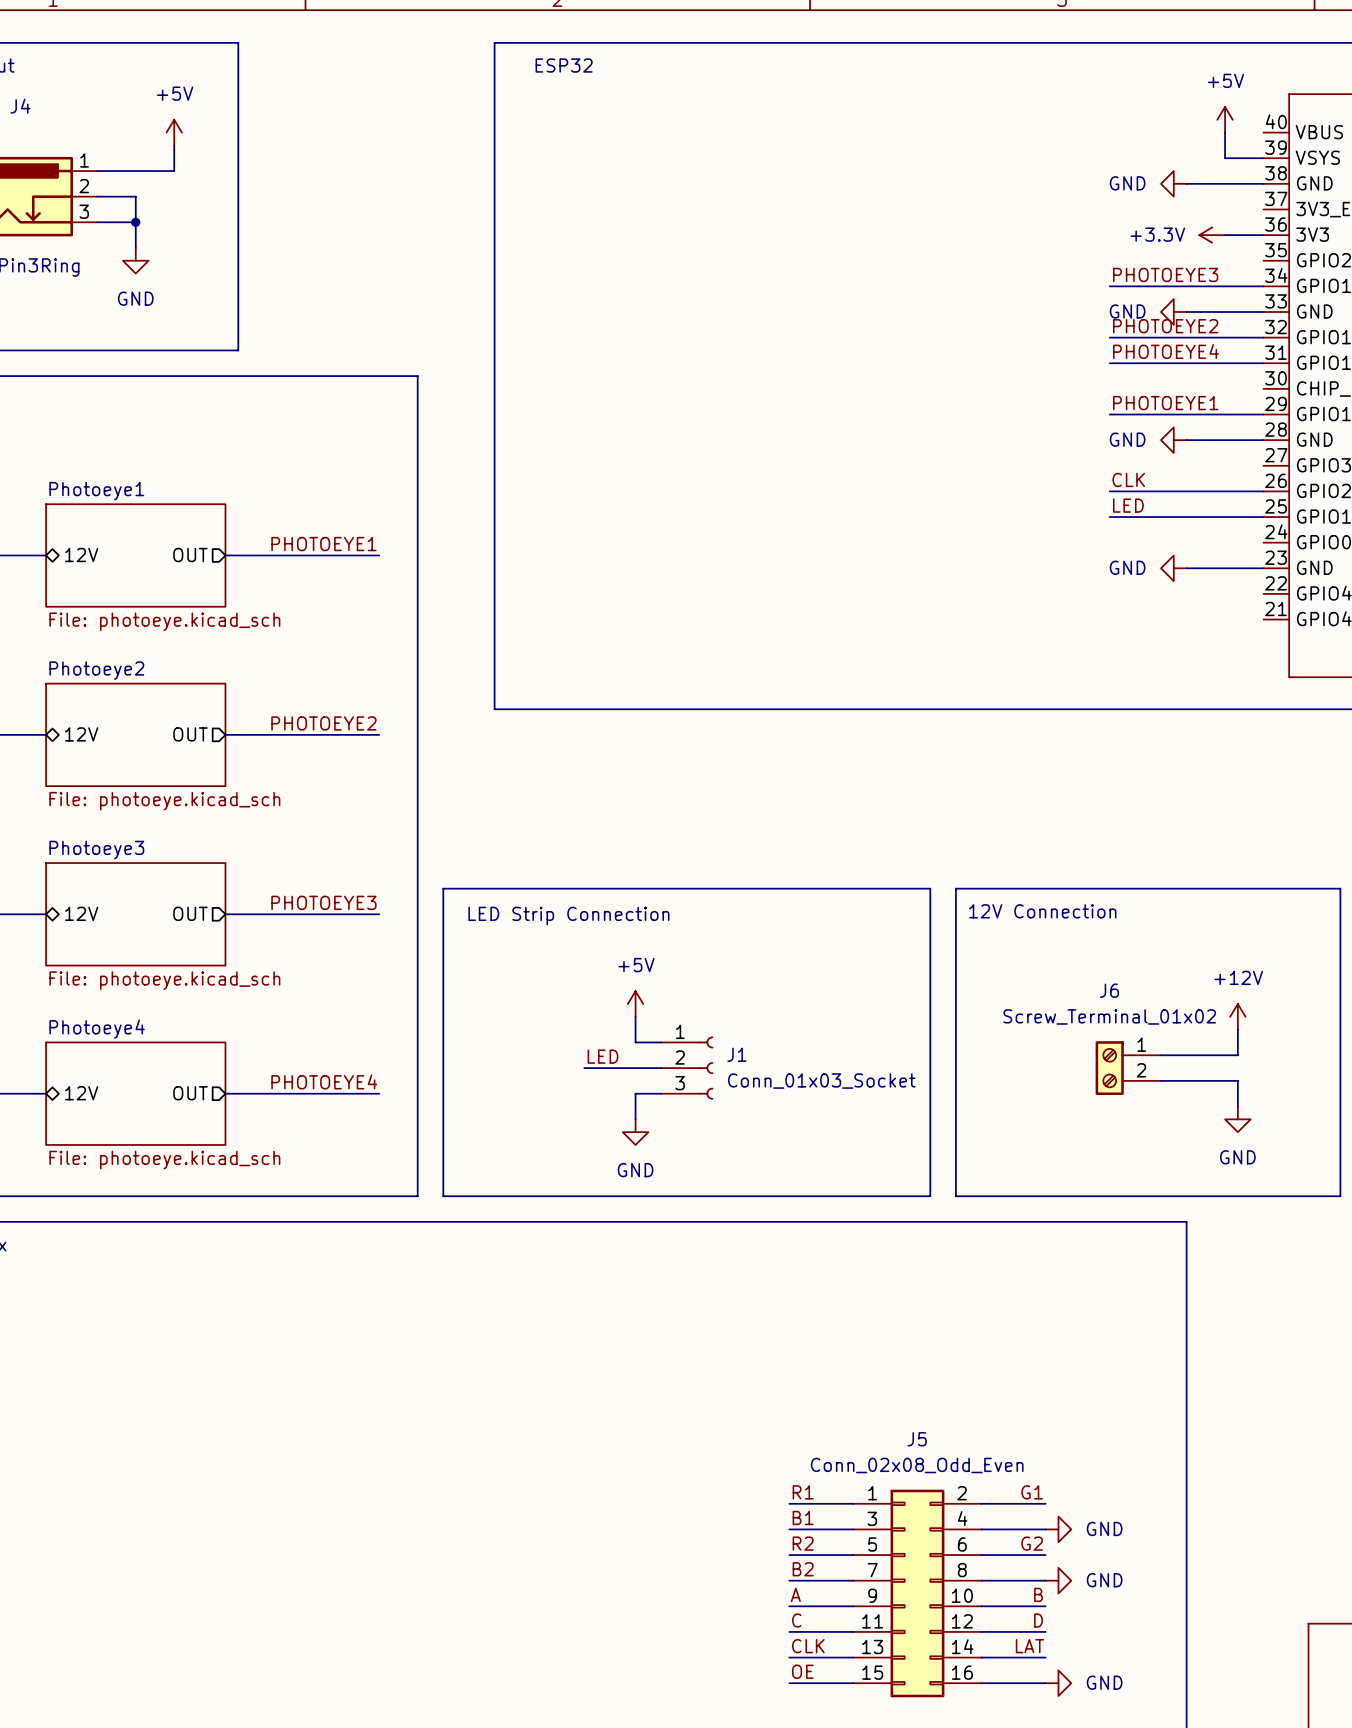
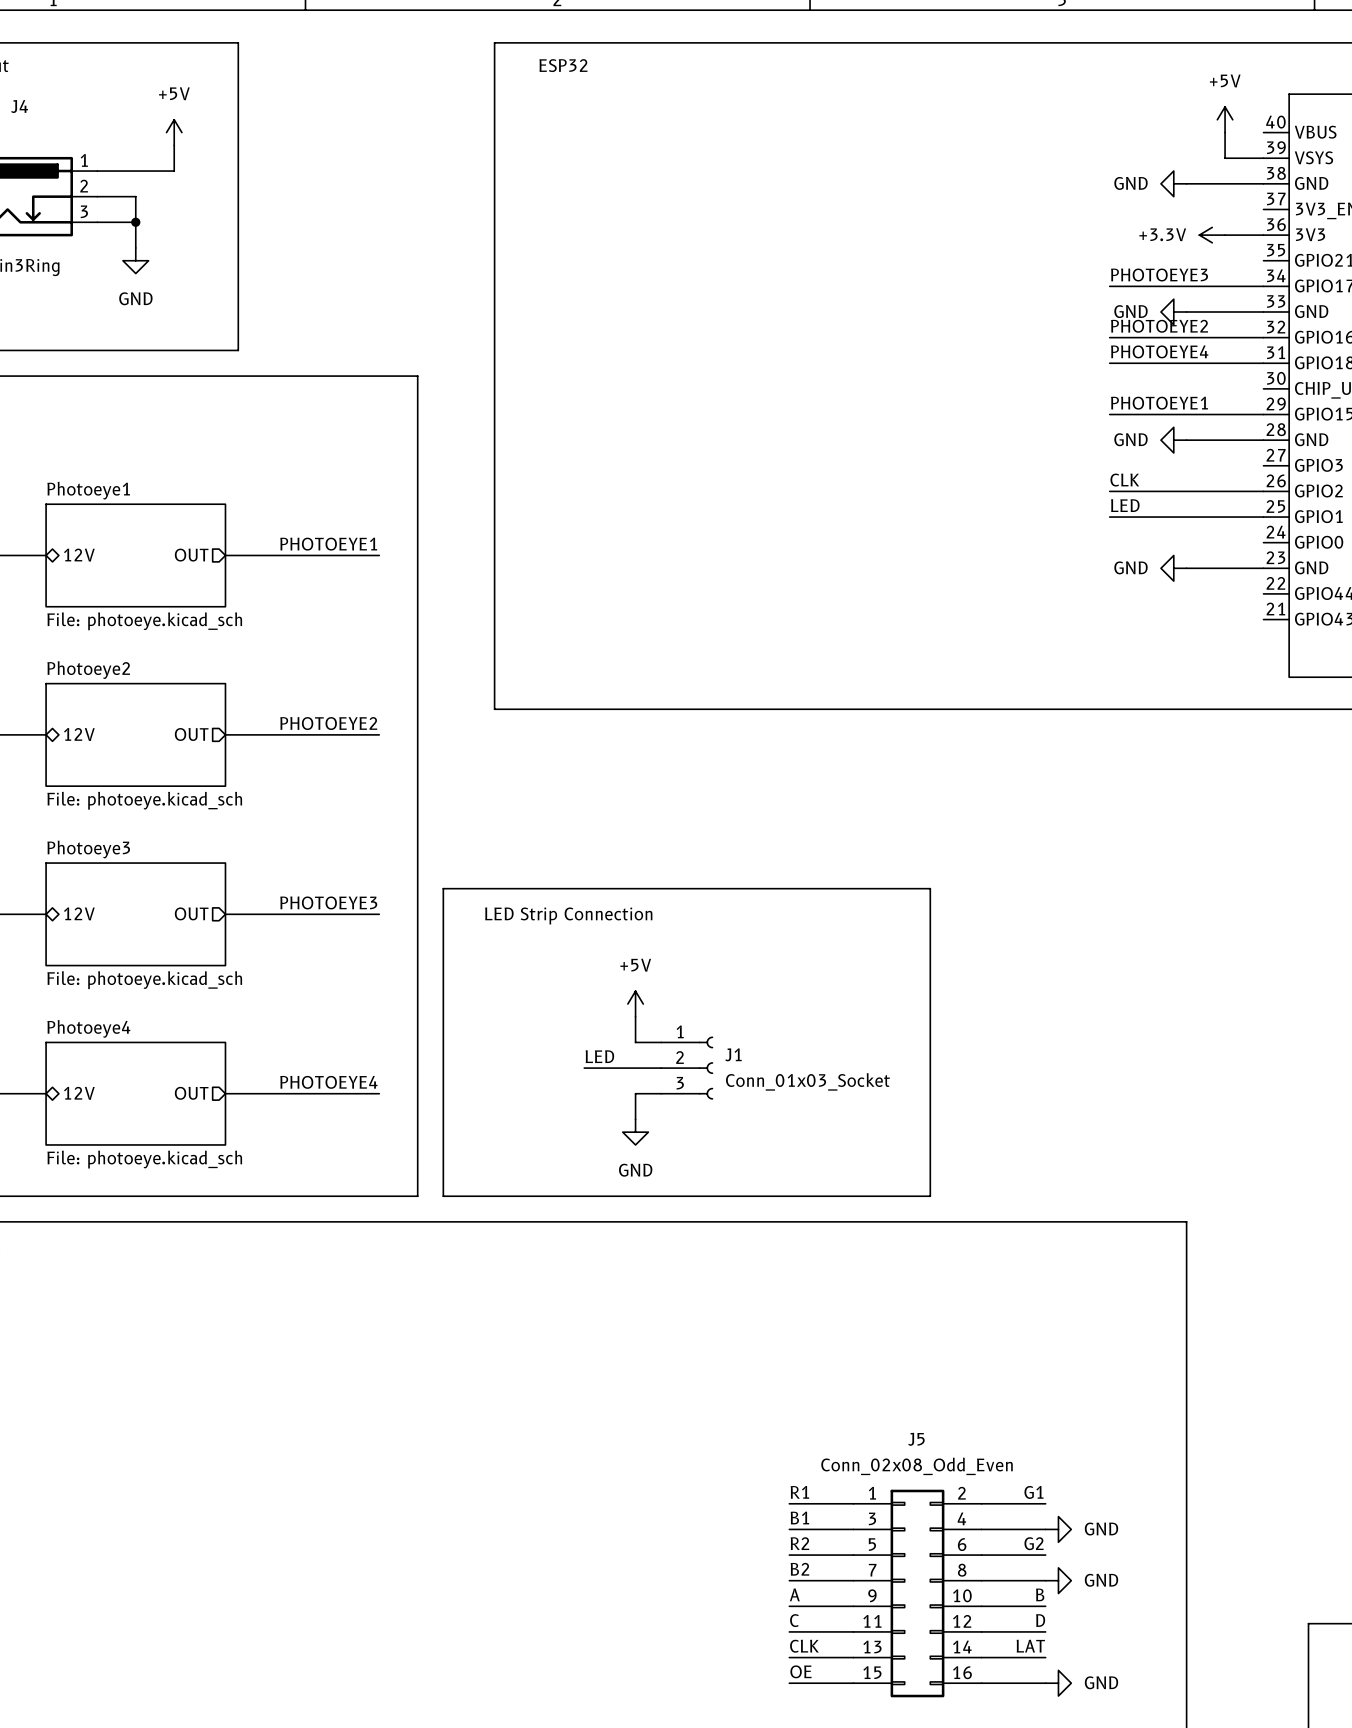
line: (955, 888) (1340, 888) (1340, 1196) (955, 1196) (955, 888) -> none
text: 12V Connection (1042, 911) -> none
power symbol: +12V (1237, 1016) -> none
wire: (1237, 1029) (1237, 1055) (1160, 1055) -> none
J6: Screw_Terminal_01x02 (1128, 1068) -> none
wire: (1160, 1080) (1237, 1080) (1237, 1106) -> none
power symbol: GND (1237, 1119) -> none

